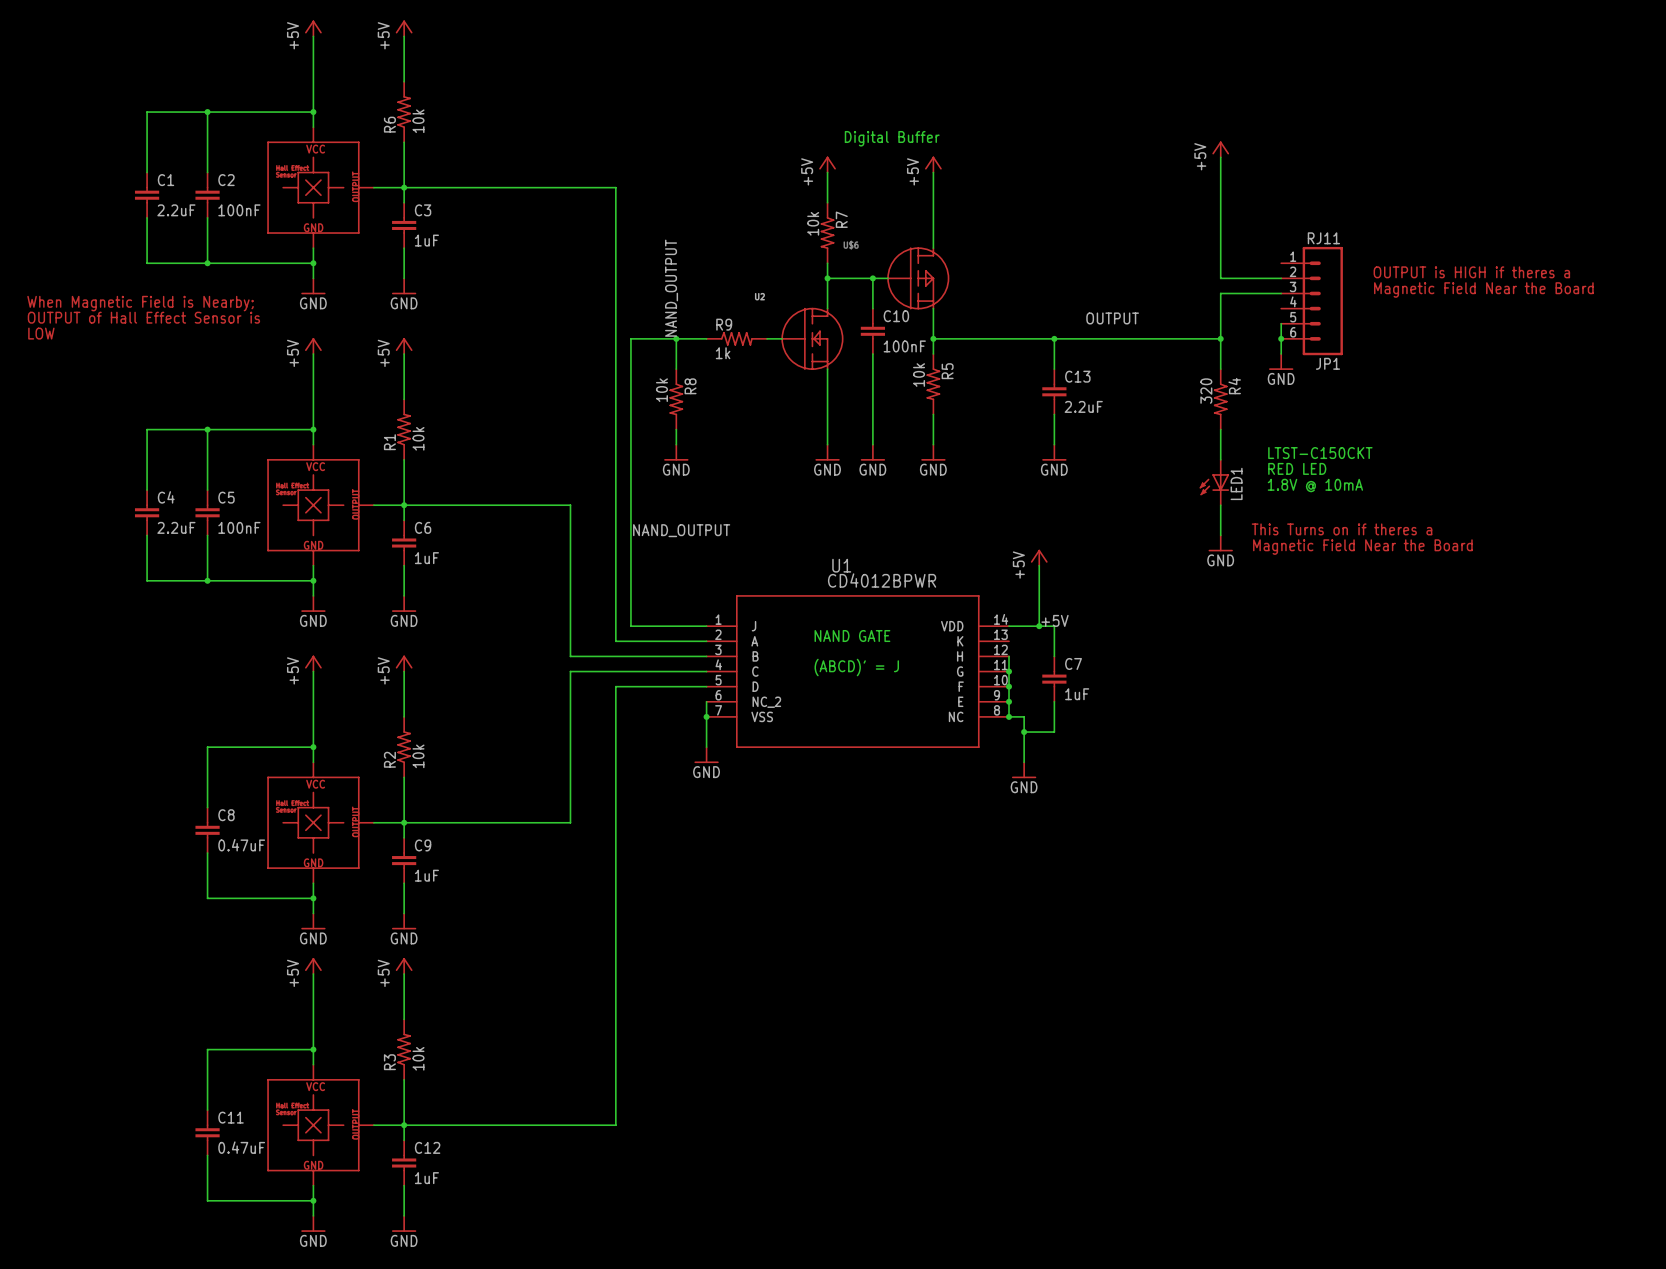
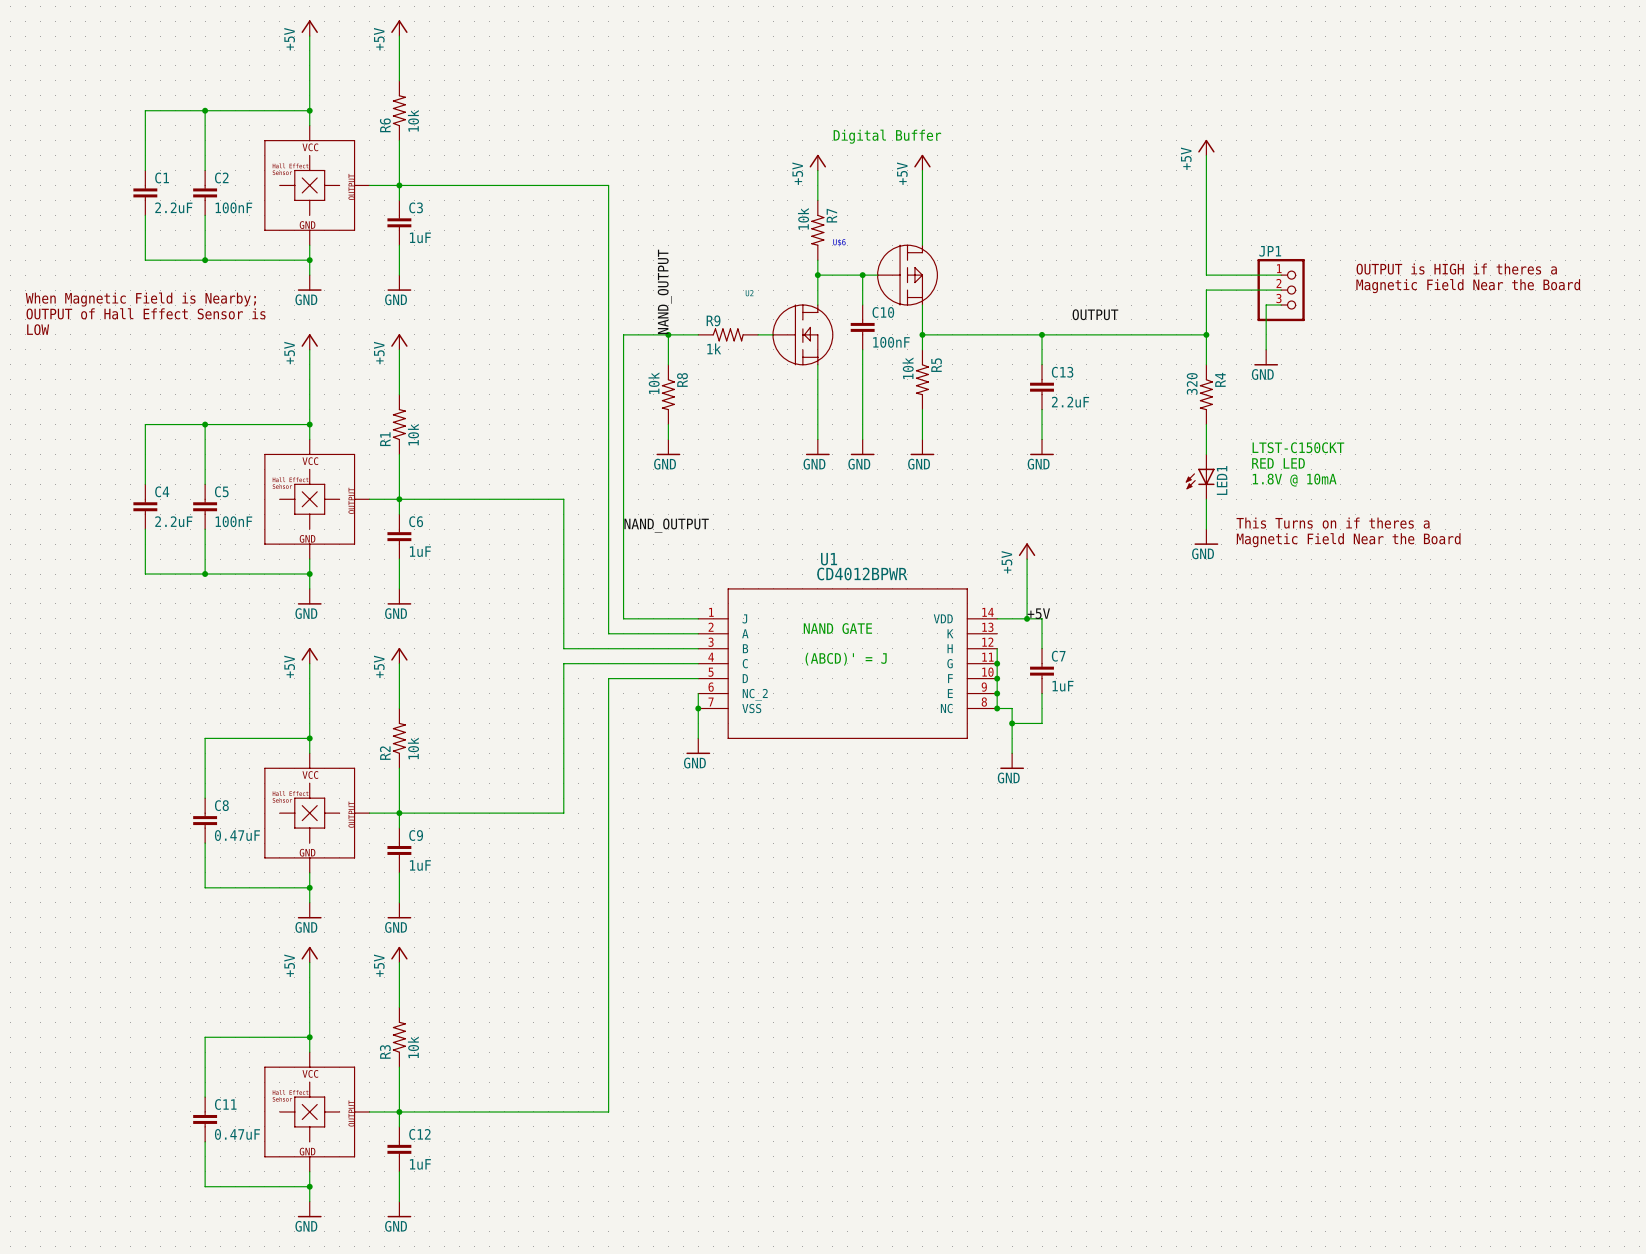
JP1 value: RJ11 (1323, 238) -> none
JP1 symbol: [1281, 246, 1343, 356] -> [1257, 258, 1305, 322]
wire: none -> (1281, 305) (1266, 305) (1266, 319)
junction: (1281, 338) -> none
JP1 name position: JP1 (1327, 363) -> JP1 (1270, 251)

